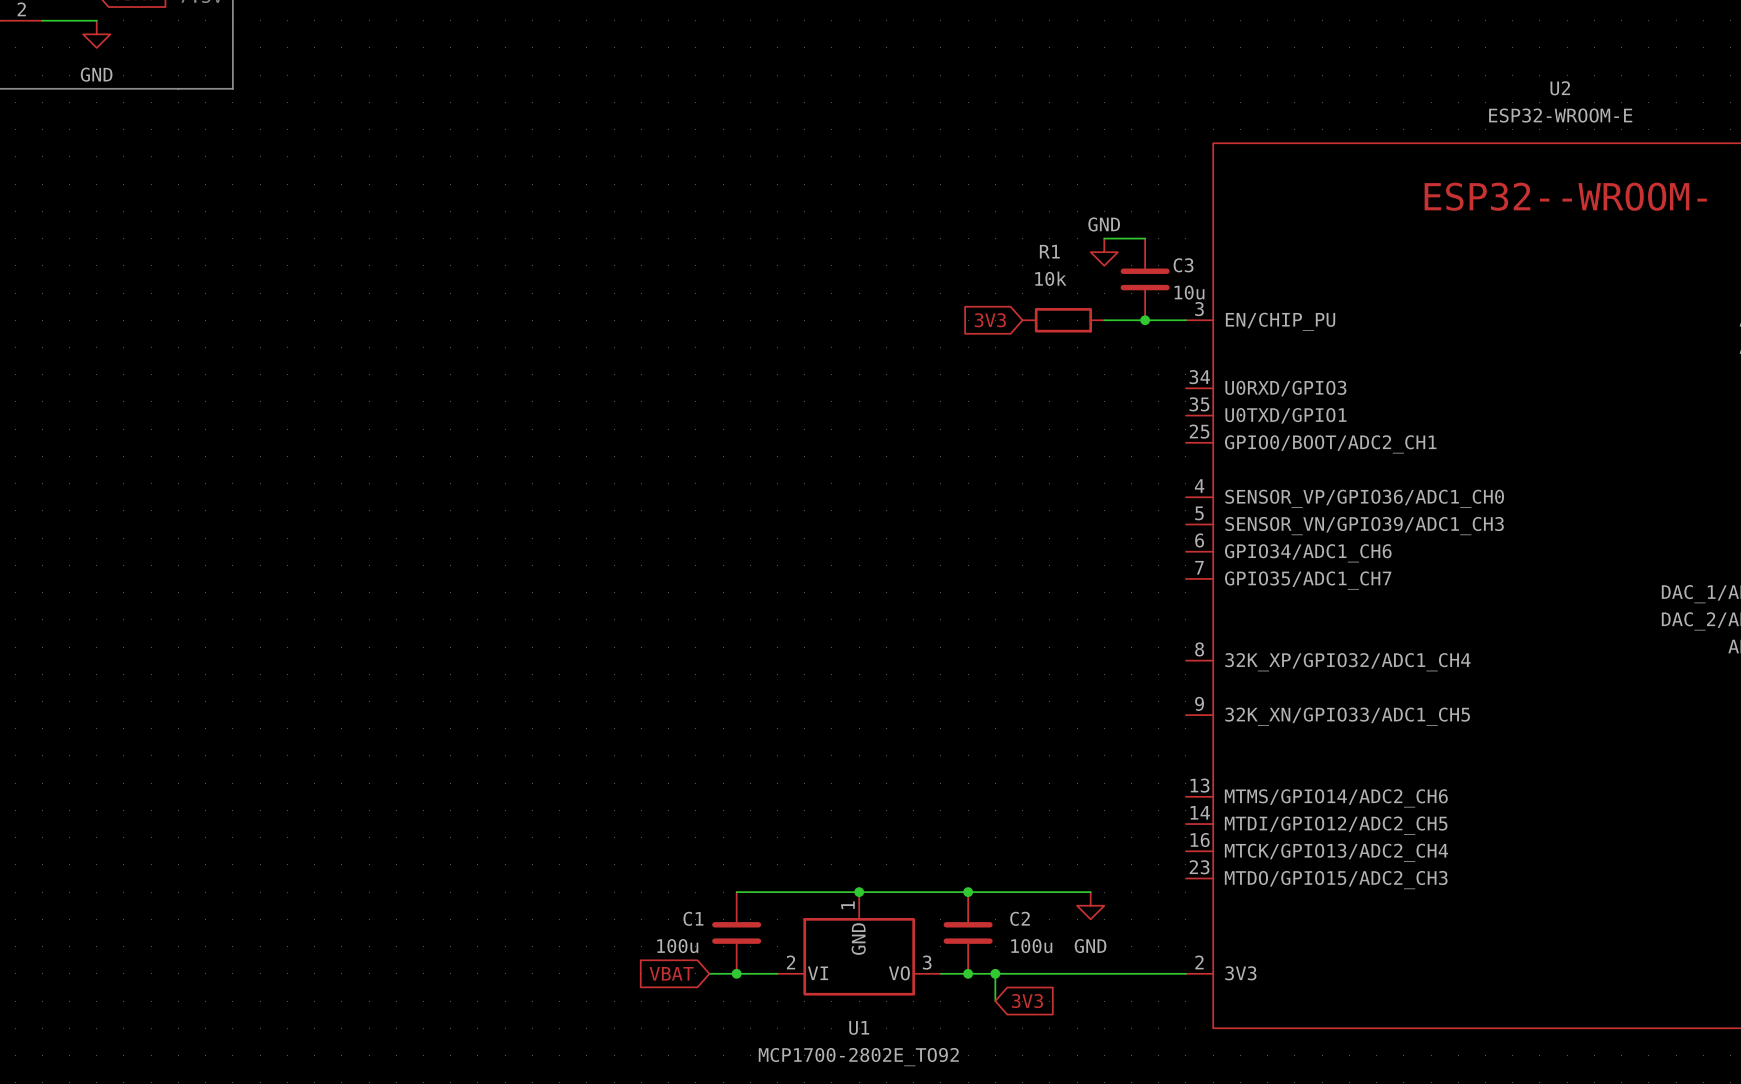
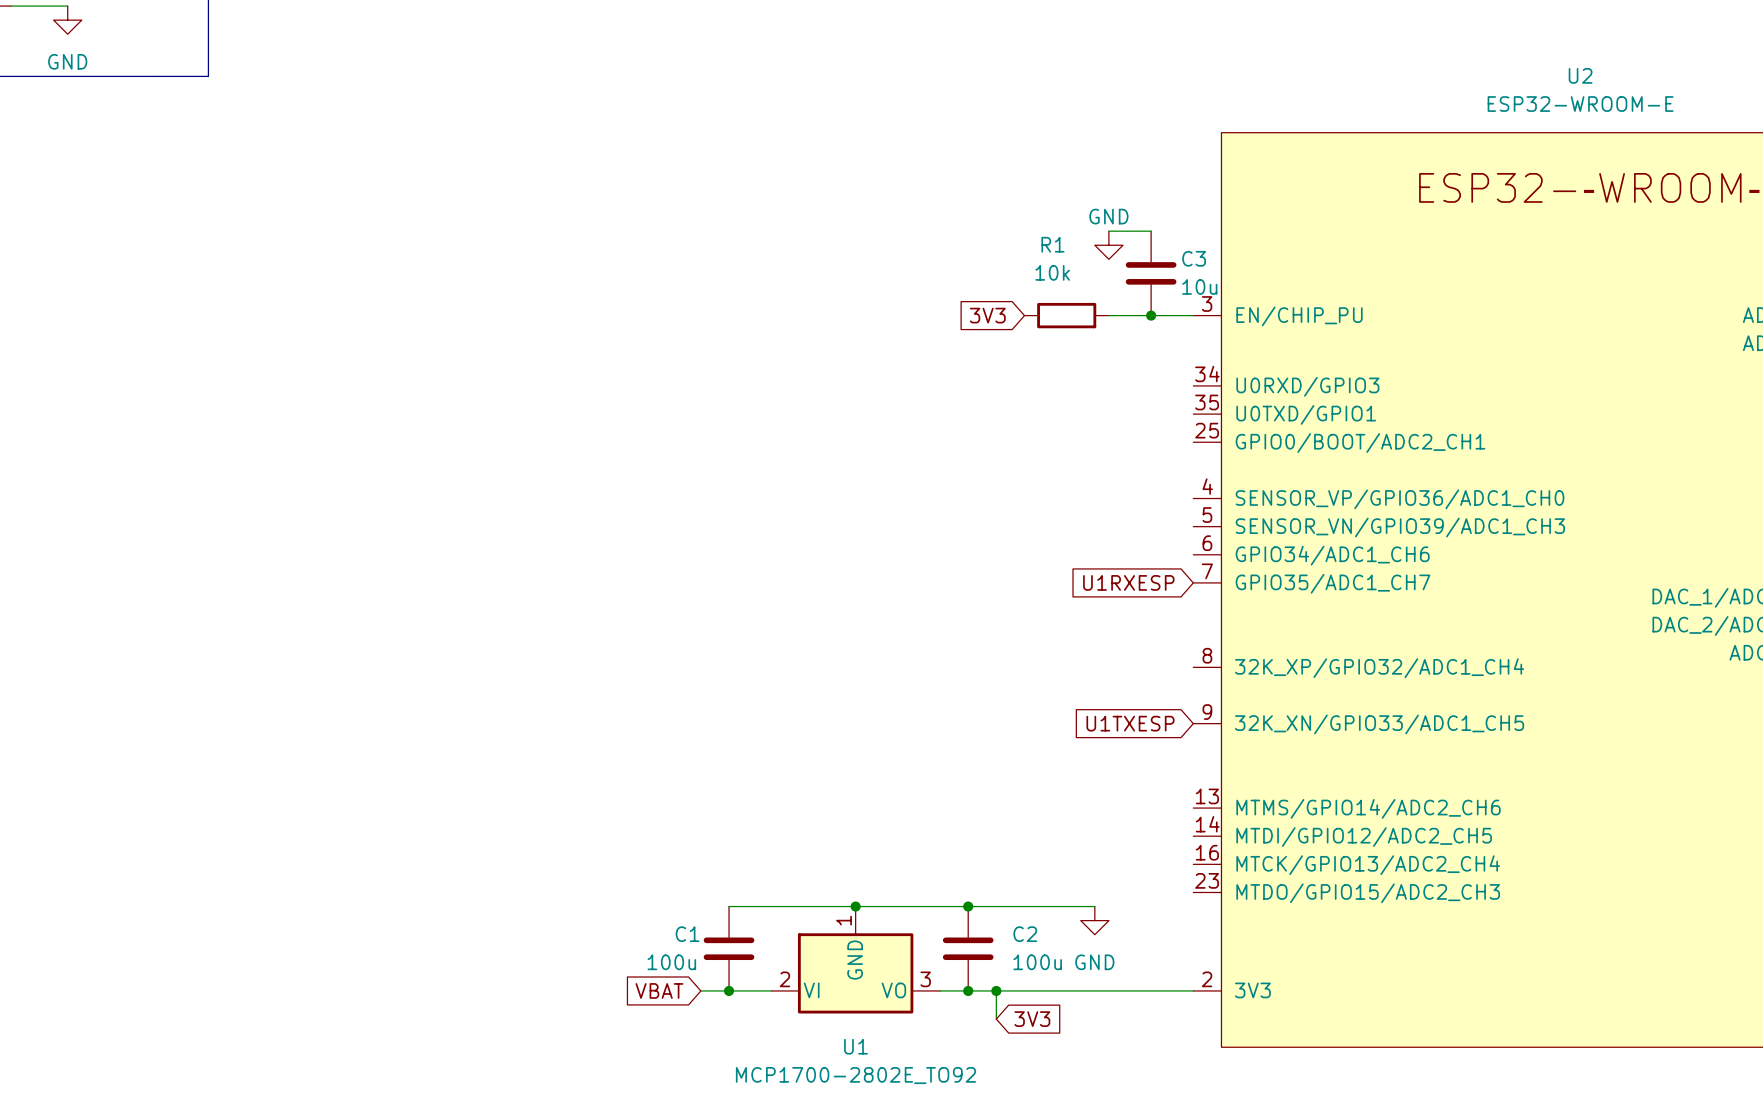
global label: none -> U1RXESP (1128, 582)
global label: none -> U1TXESP (1130, 723)

